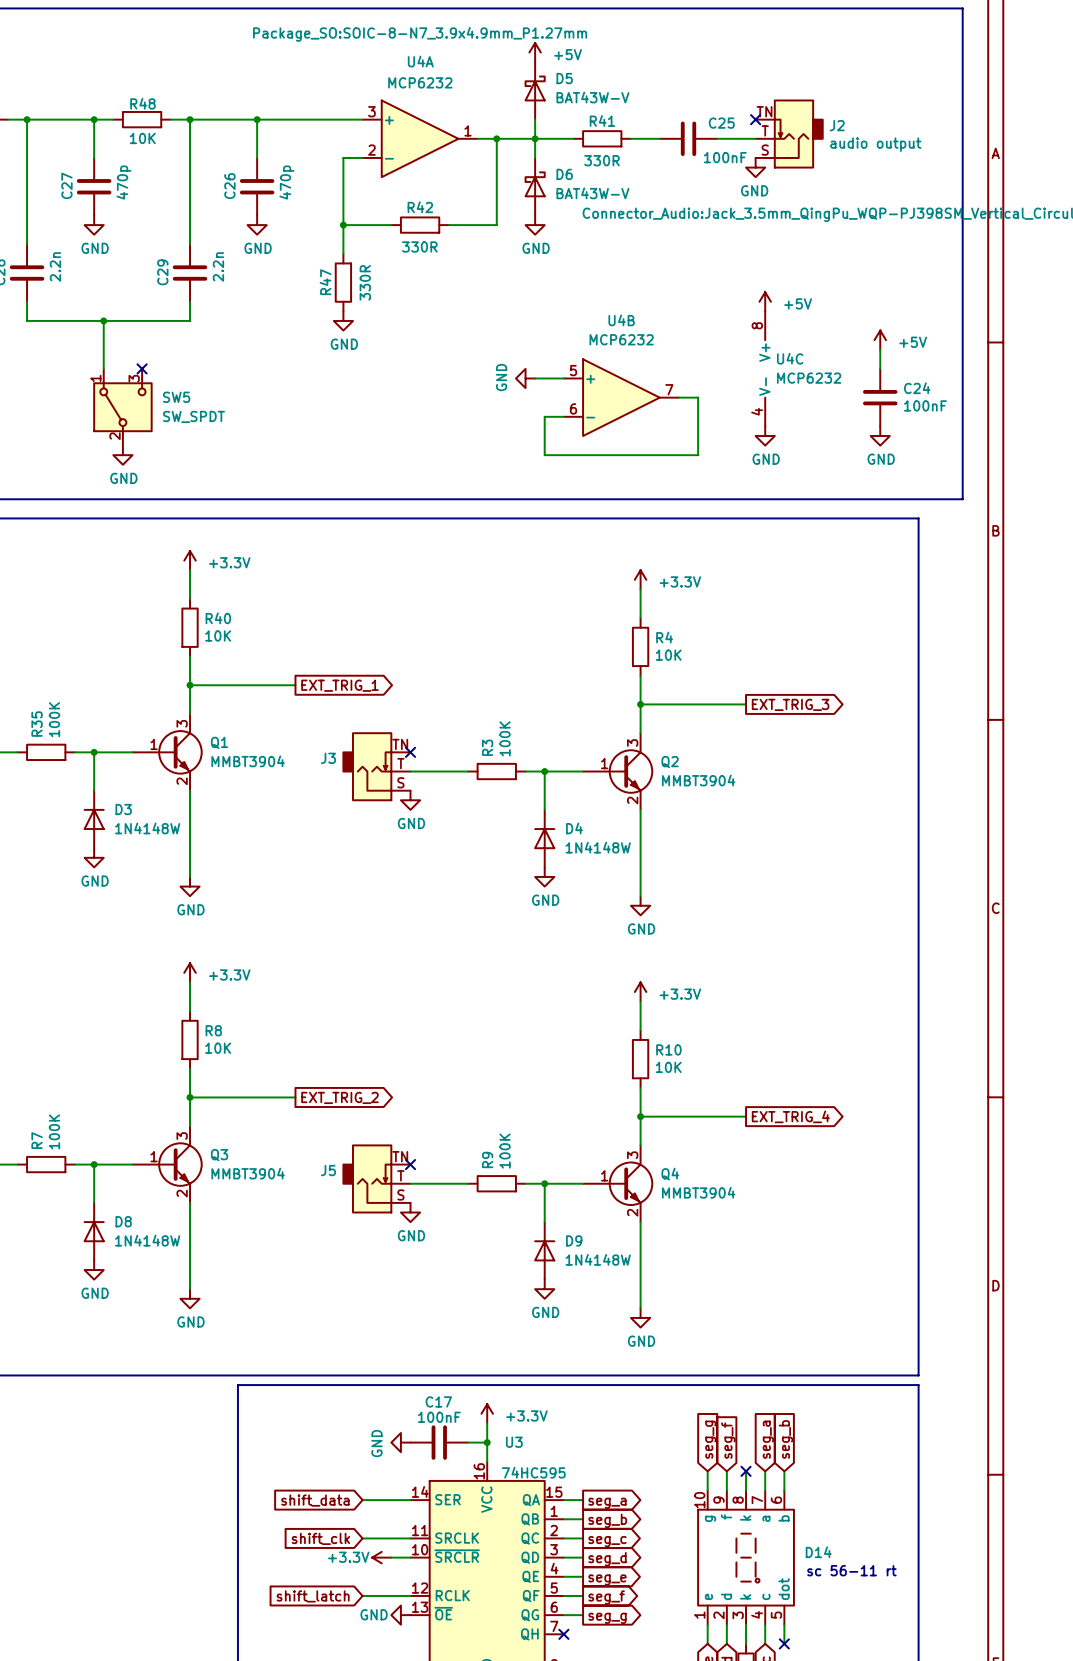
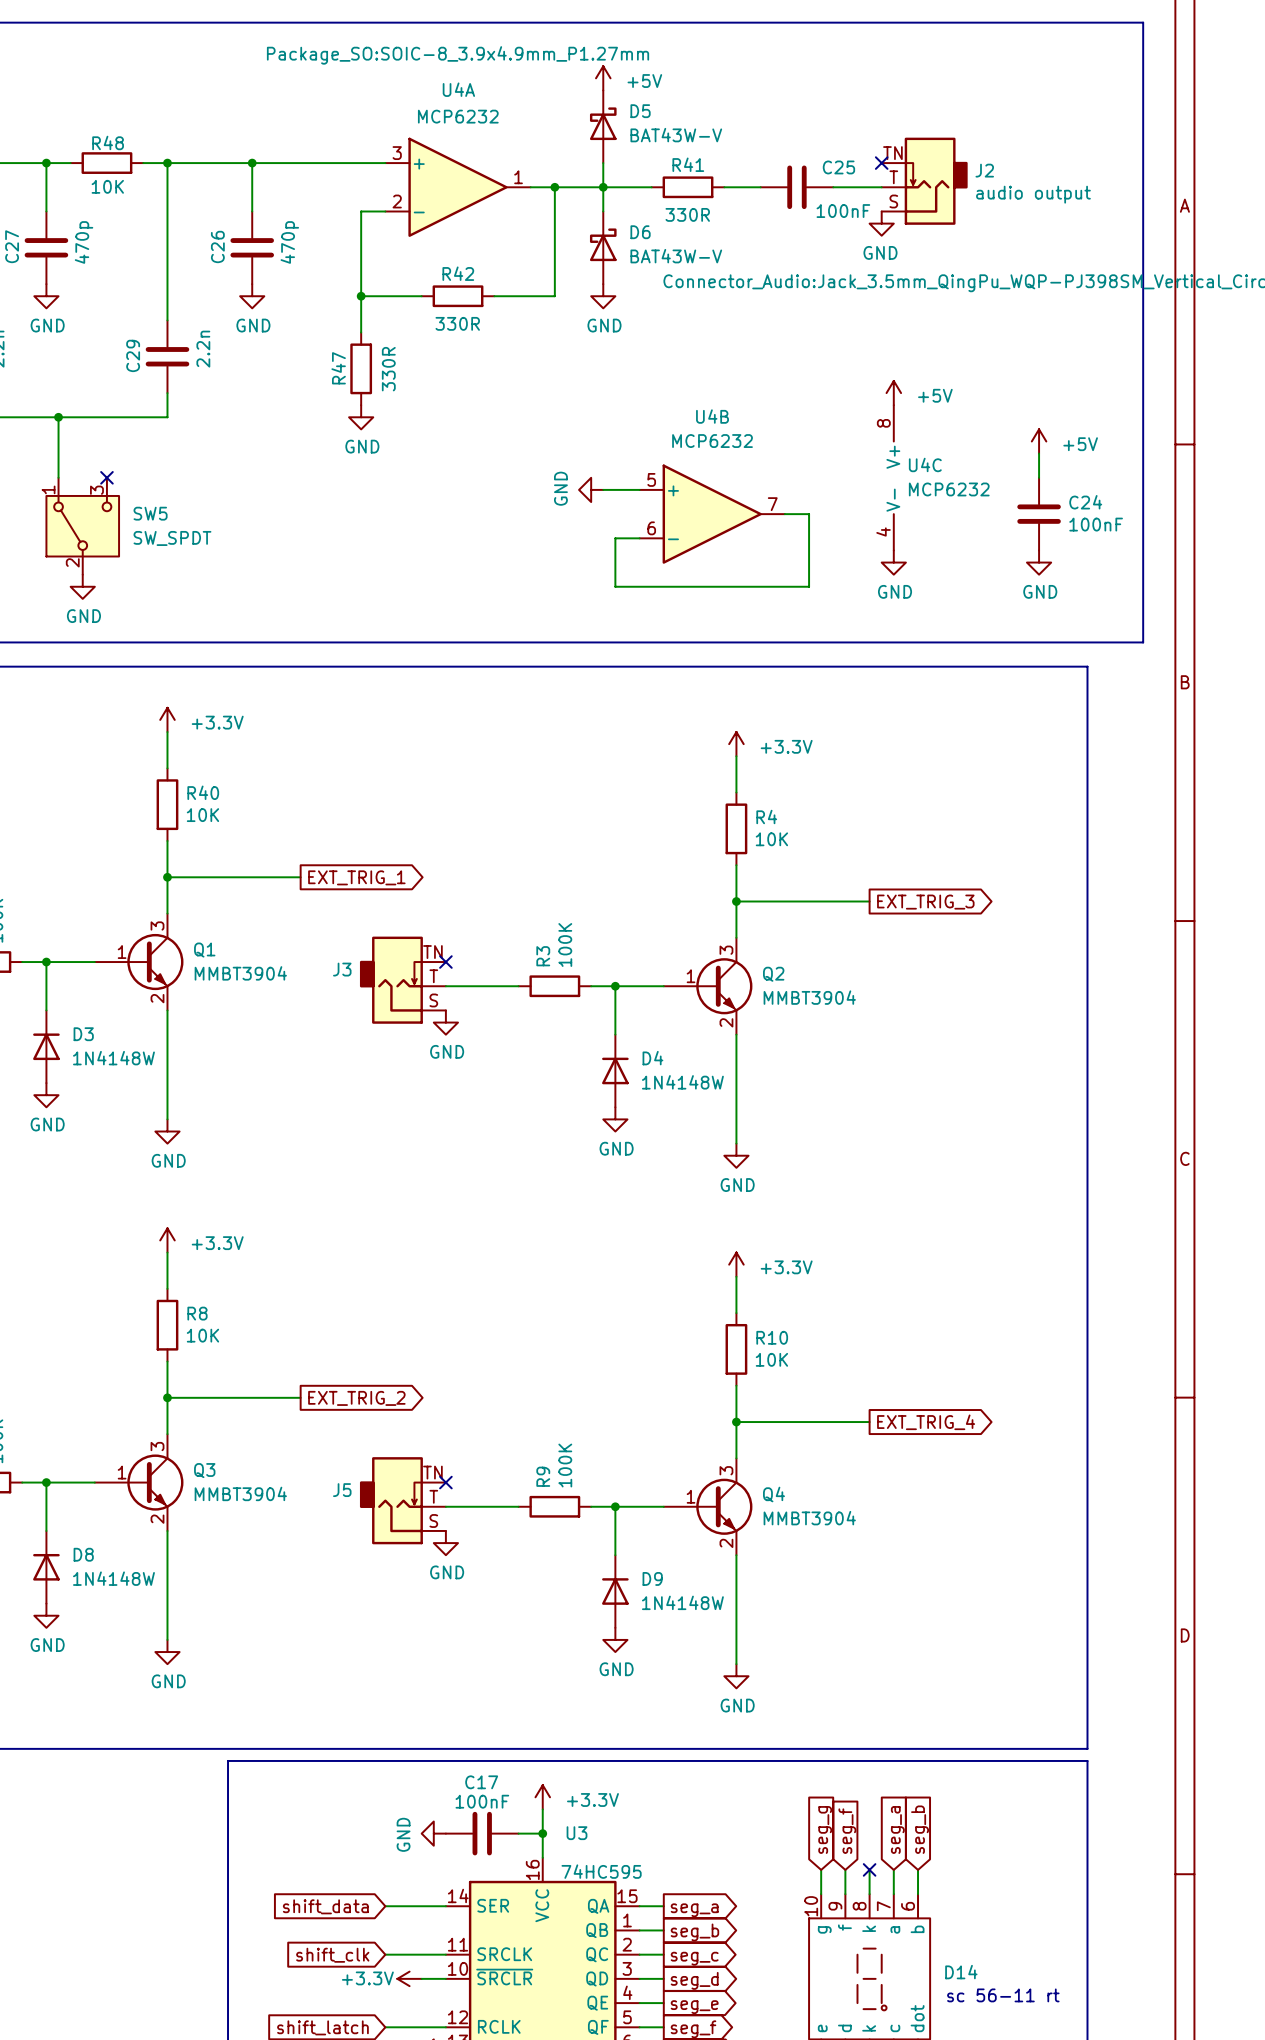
U4A text: Package_SO:SOIC-8-N7_3.9x4.9mm_P1.27mm (420, 34) -> Package_SO:SOIC-8_3.9x4.9mm_P1.27mm (458, 55)

